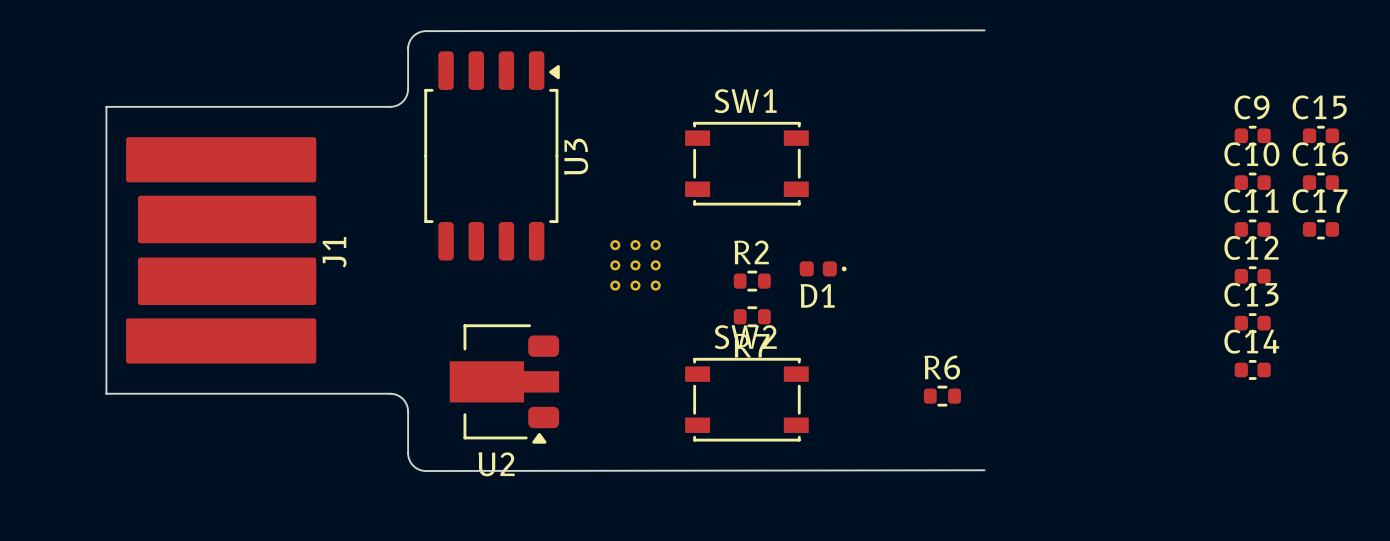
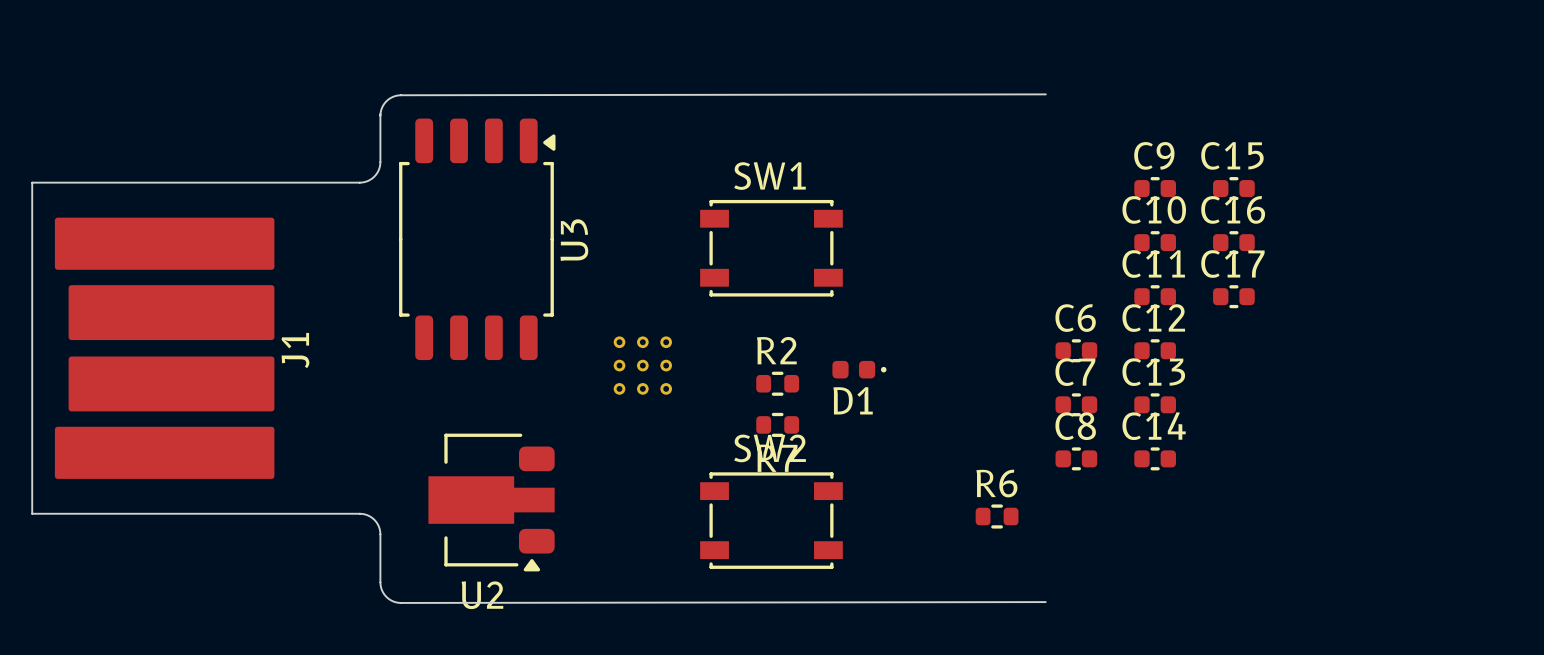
C9 position: (1252, 135) -> (1155, 188)
C15 position: (1320, 135) -> (1233, 188)
C10 position: (1252, 182) -> (1155, 242)
C16 position: (1320, 182) -> (1233, 242)
C11 position: (1252, 229) -> (1155, 296)
C17 position: (1320, 229) -> (1233, 296)
C6: none -> (1076, 350)
C12 position: (1252, 276) -> (1155, 350)
C7: none -> (1076, 404)
C13 position: (1252, 323) -> (1155, 404)
C8: none -> (1076, 458)
C14 position: (1252, 369) -> (1155, 458)

